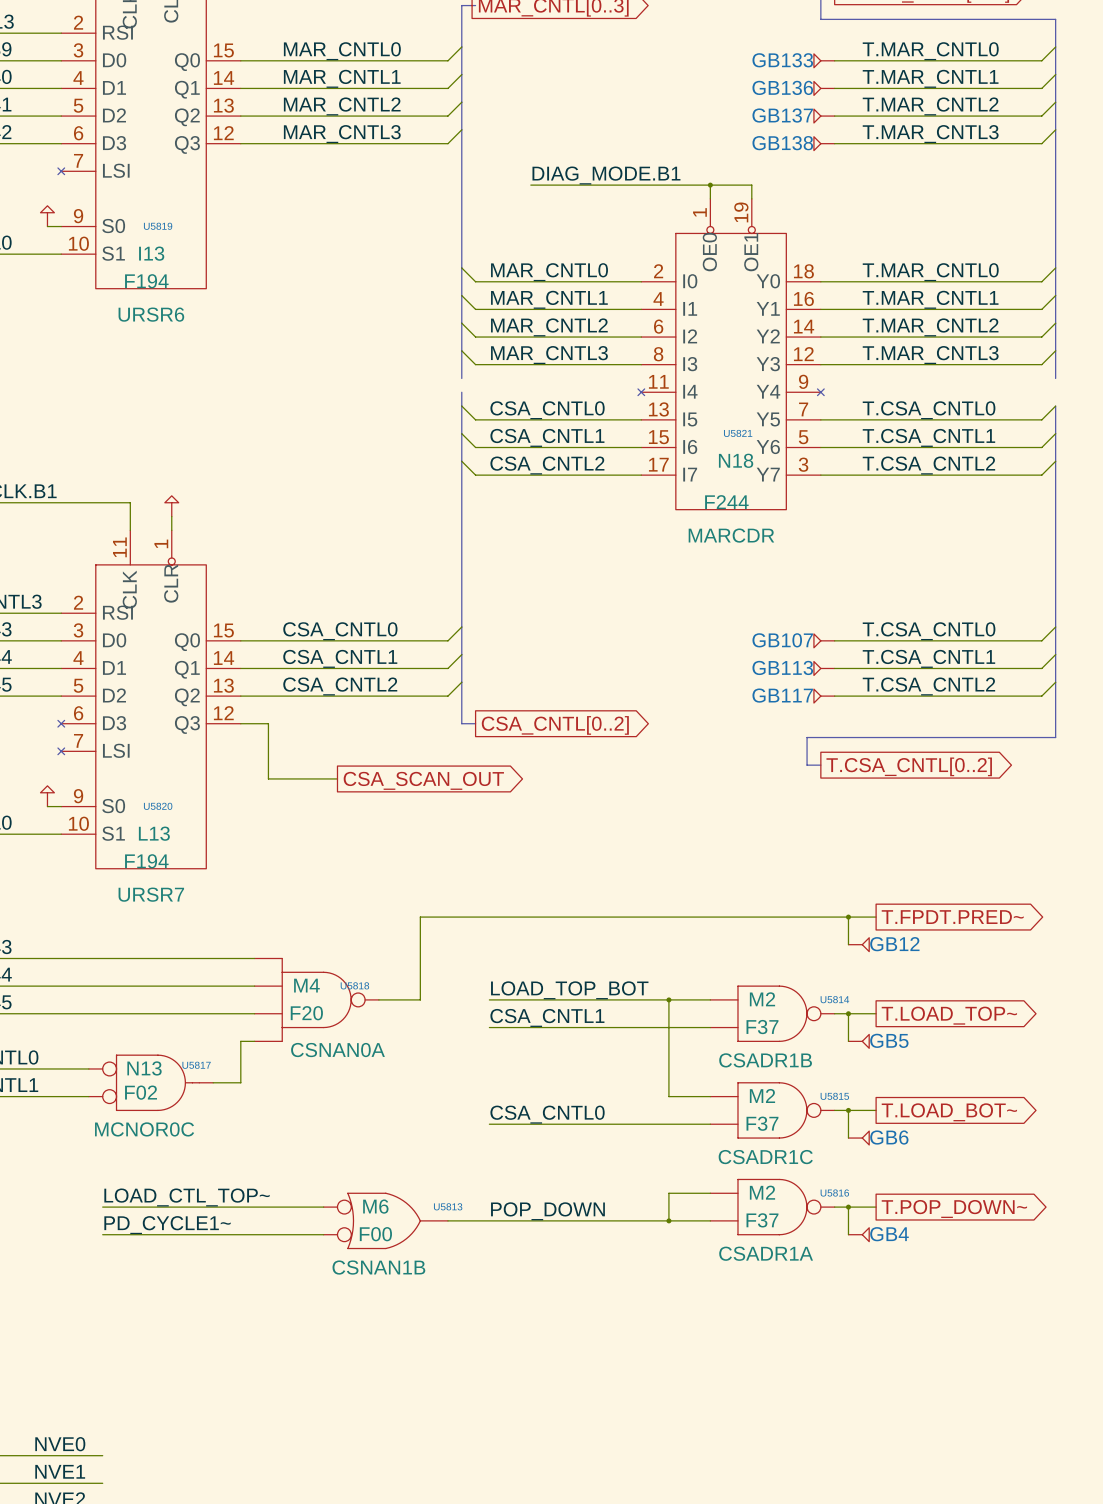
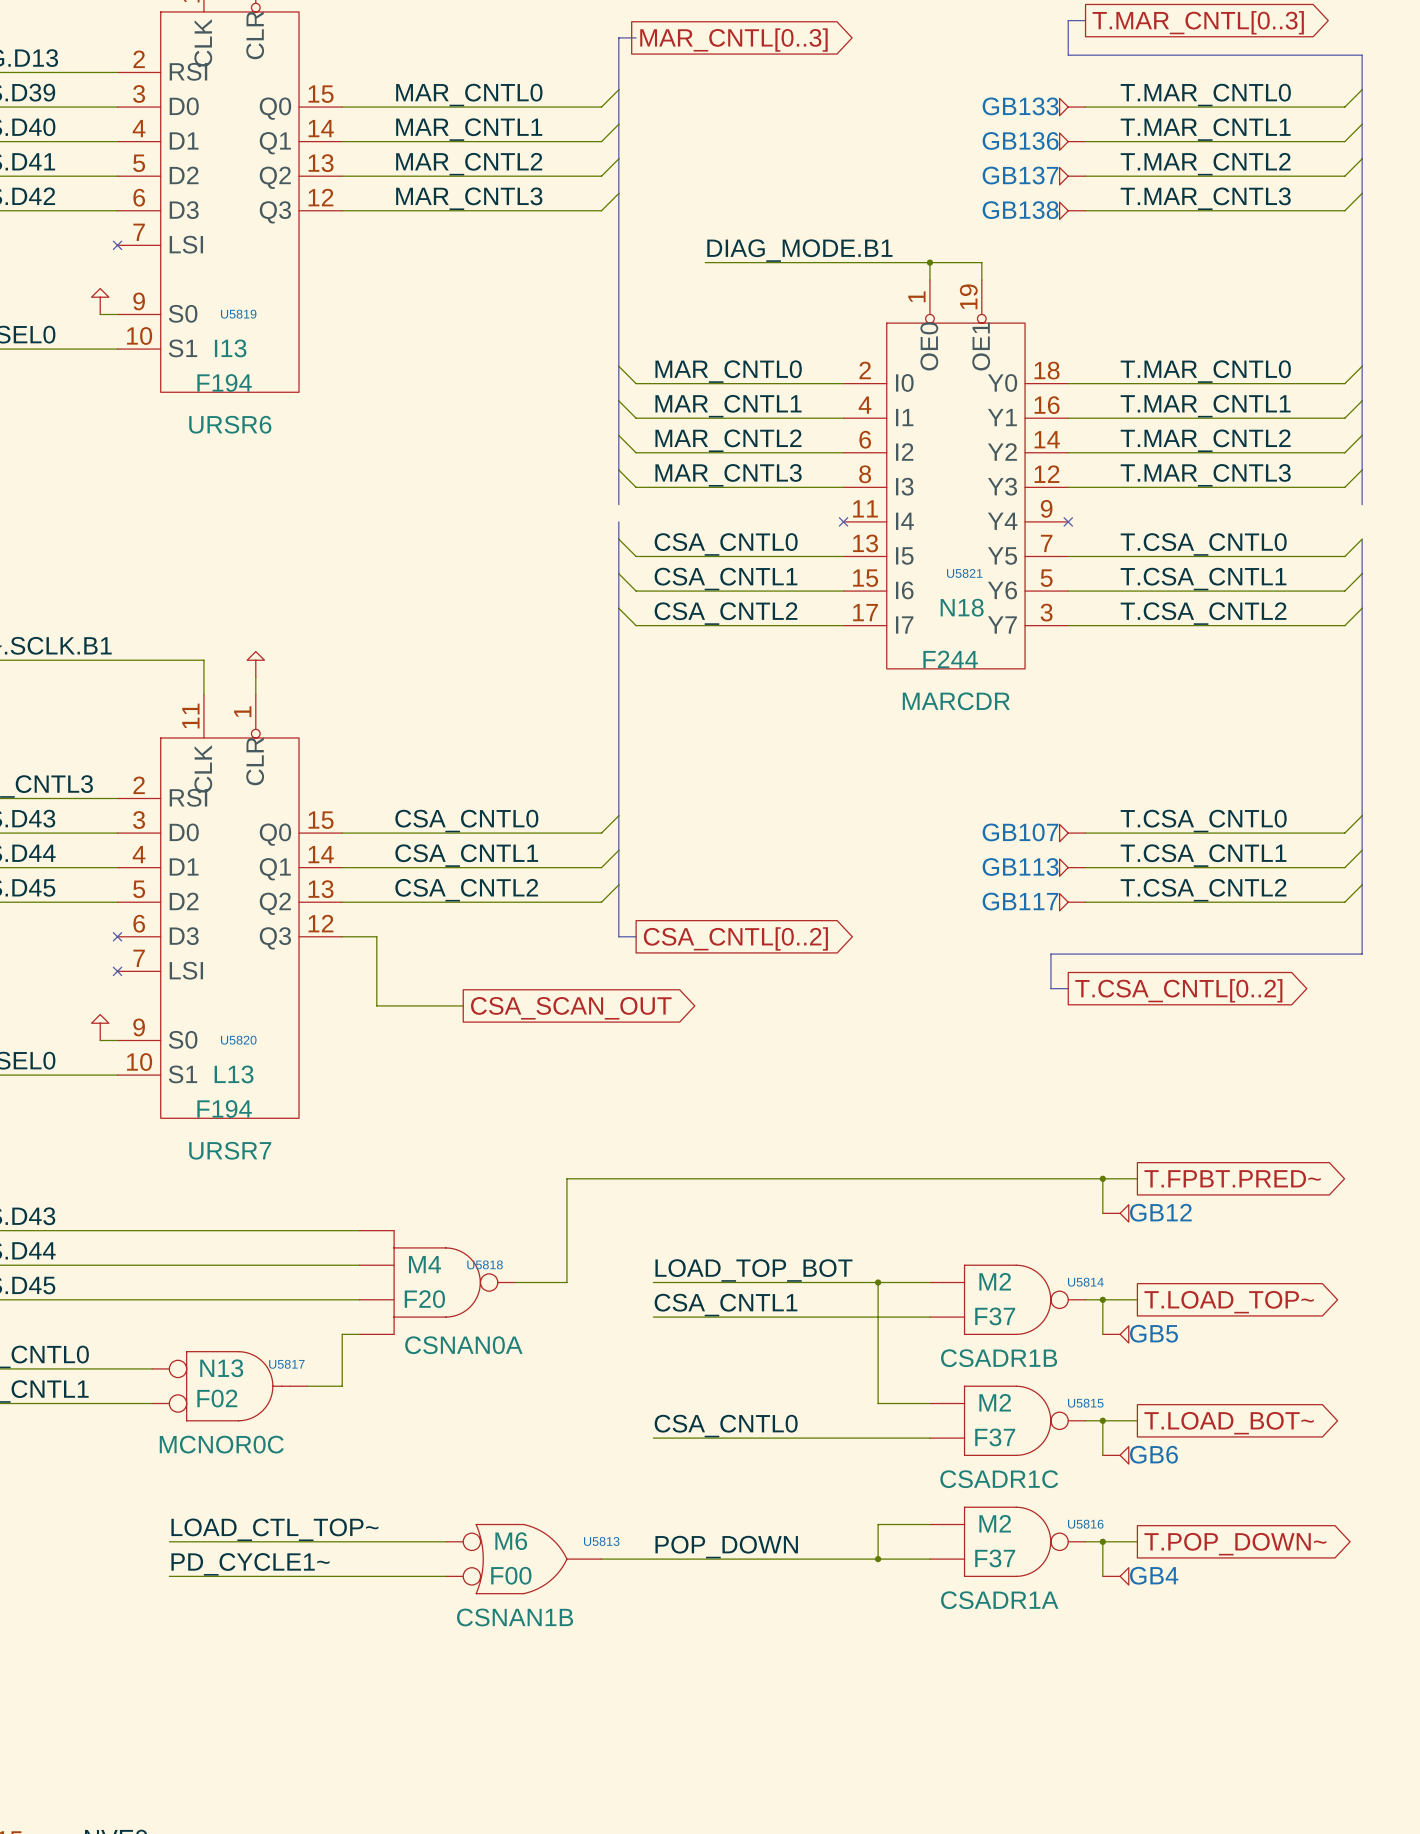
global label: T.FPDT.PRED~ (952, 917) -> T.FPBT.PRED~ (1232, 1178)

